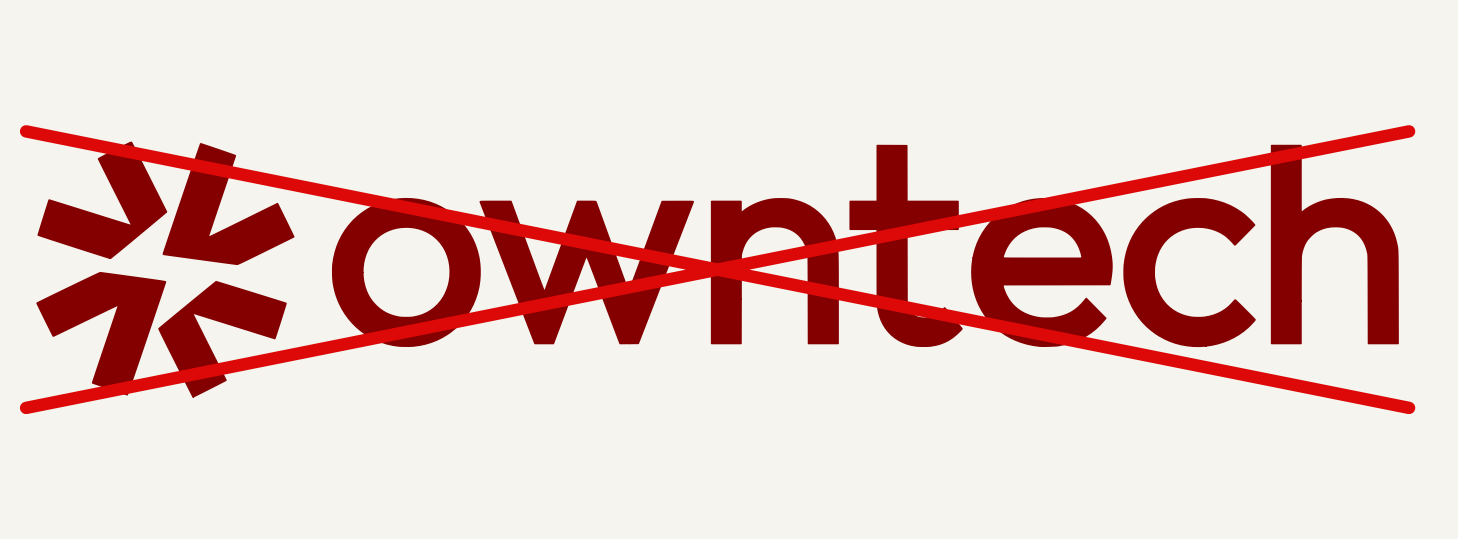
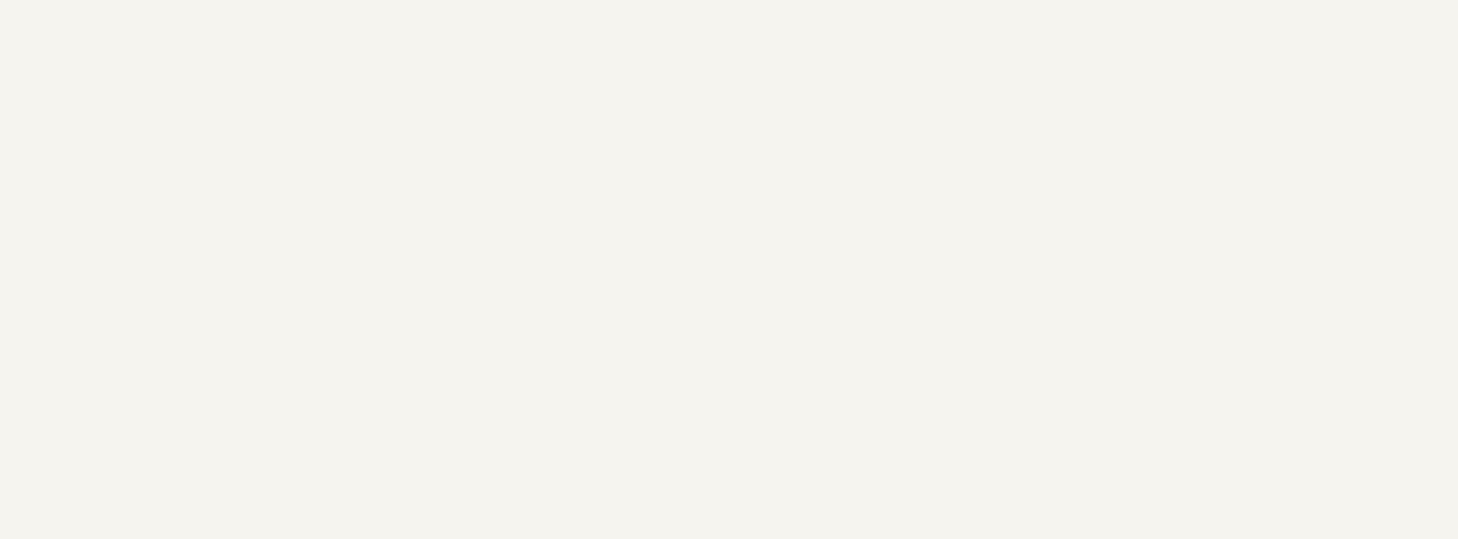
part: (717, 269) -> none

